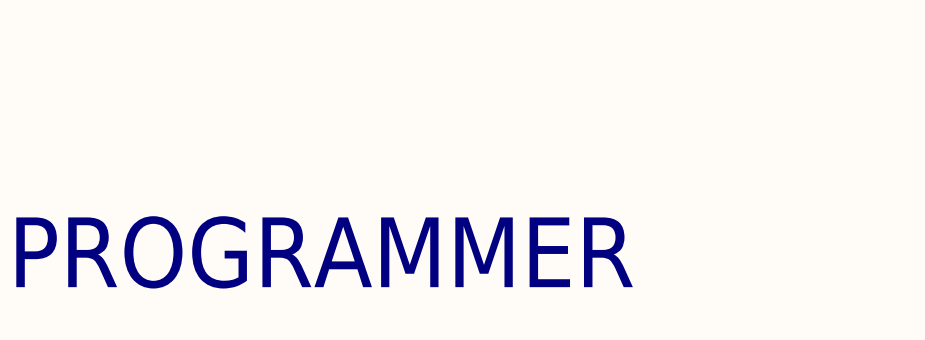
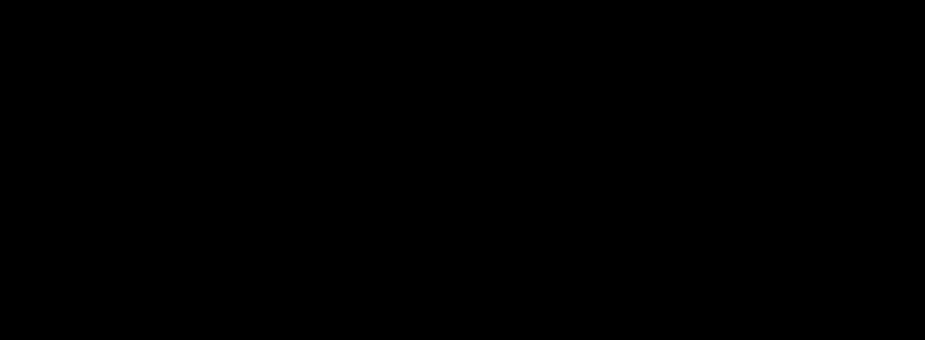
text: PROGRAMMER (324, 252) -> none

